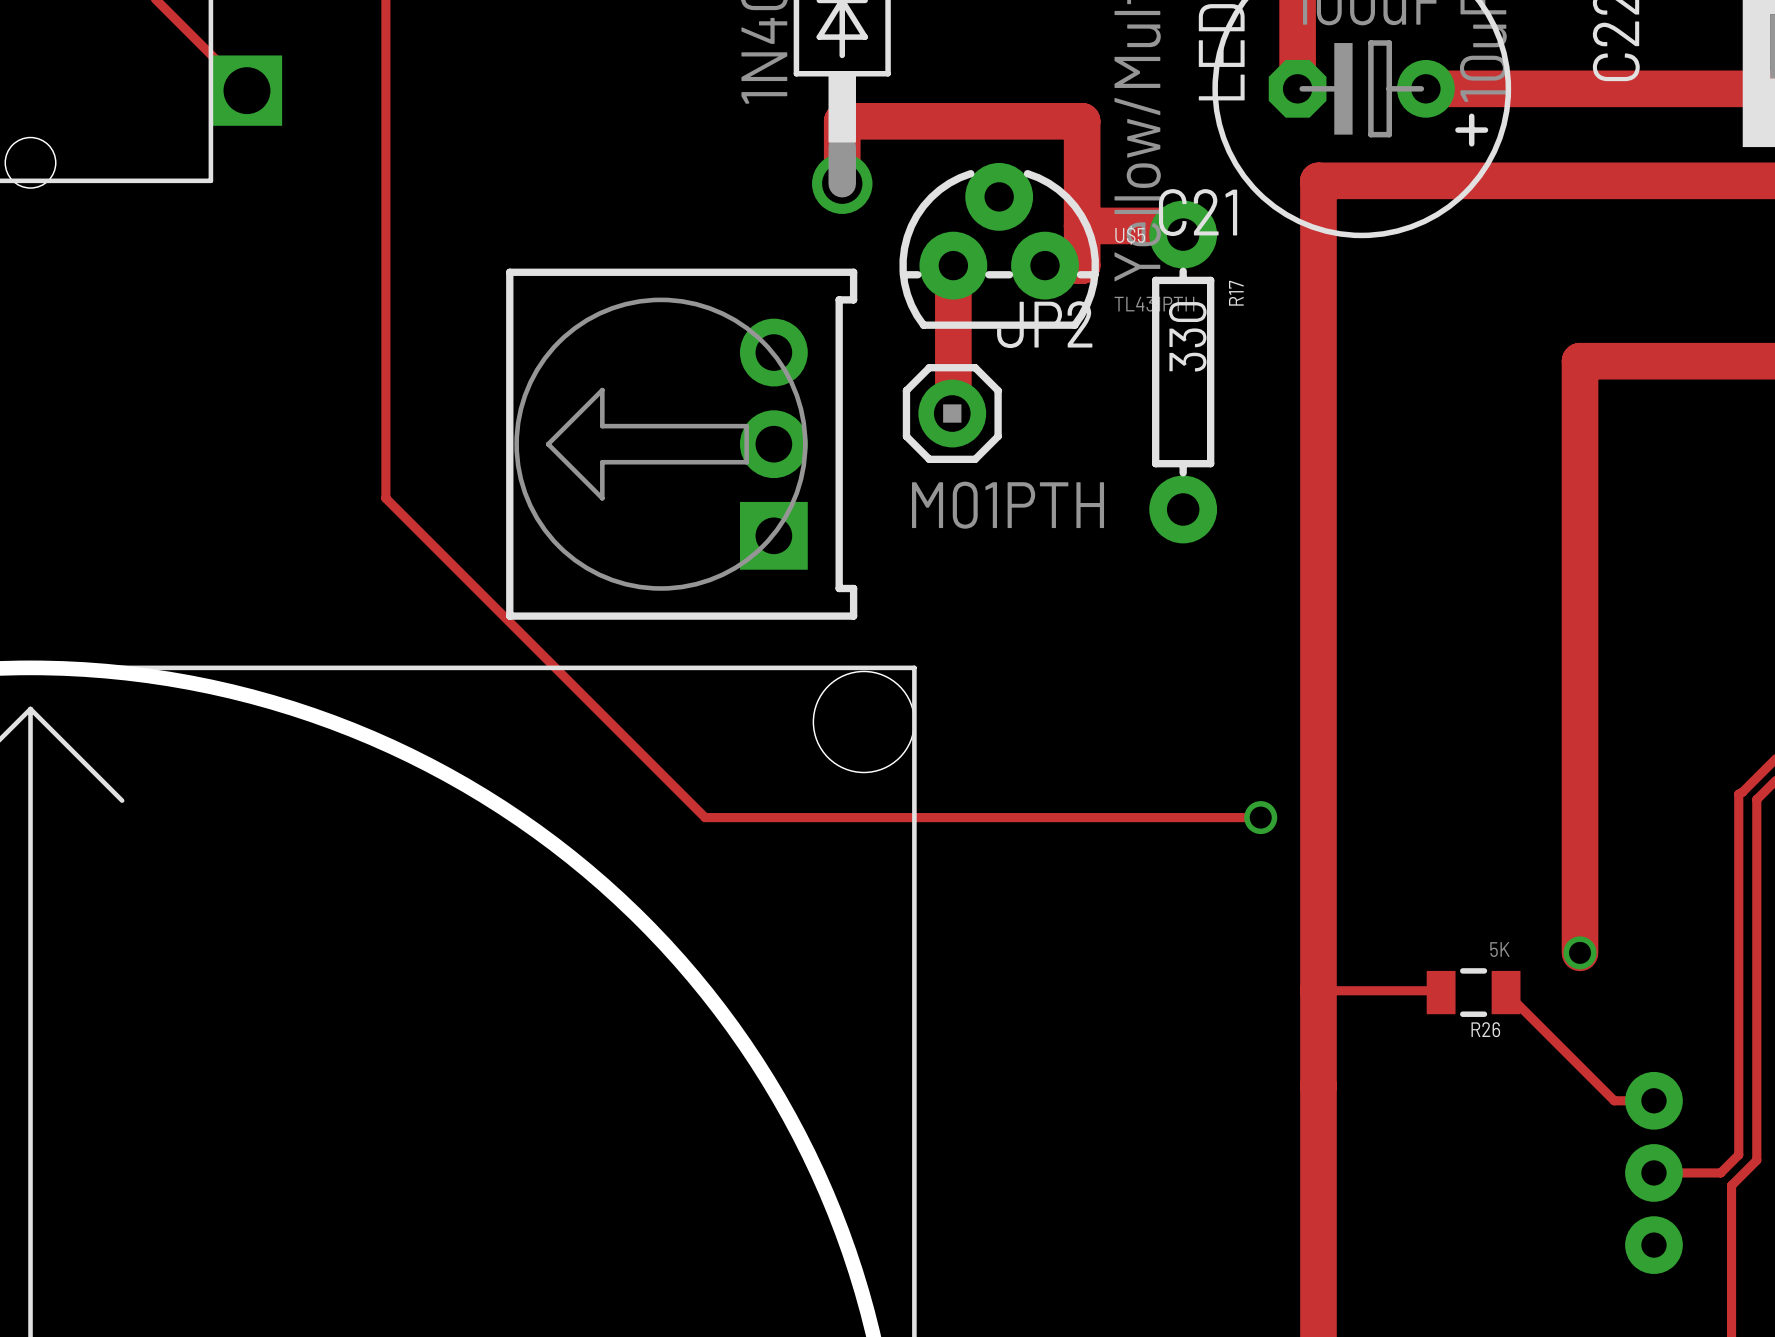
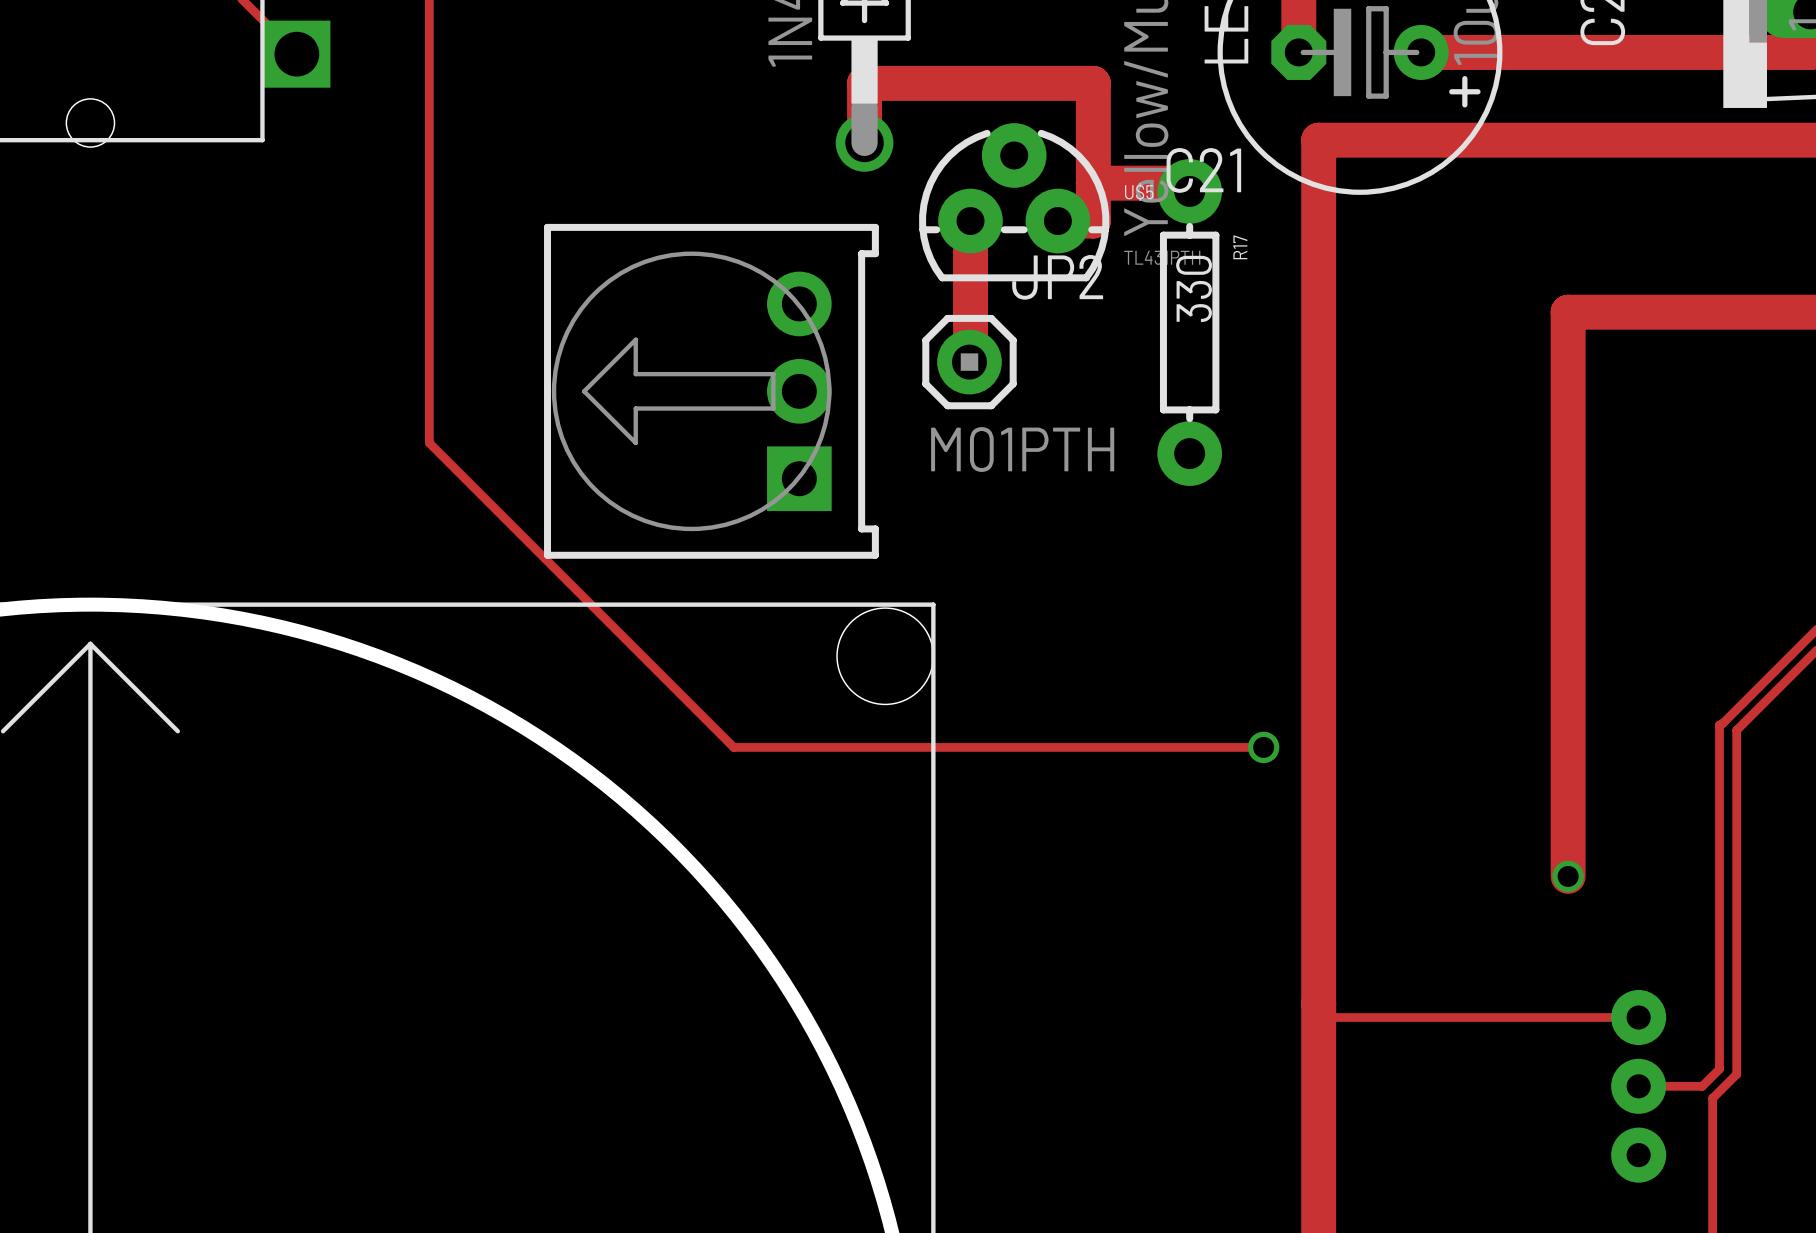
track: (1318, 990) (1441, 990) (1441, 992) -> none
R26: 5K (1473, 992) -> none
track: (1506, 992) (1614, 1100) -> (1318, 1017) (1600, 1017)

